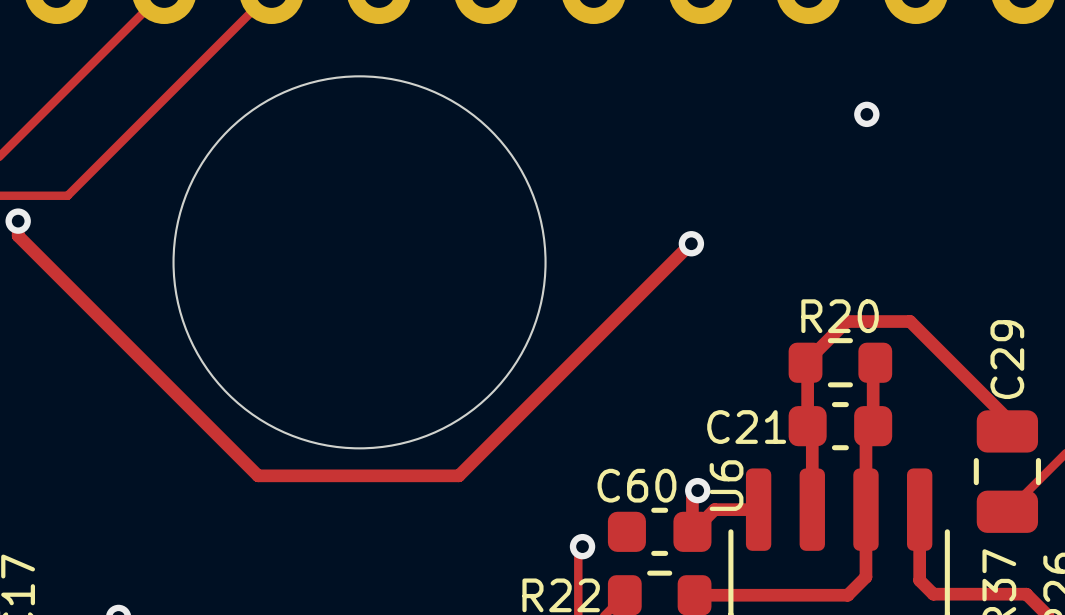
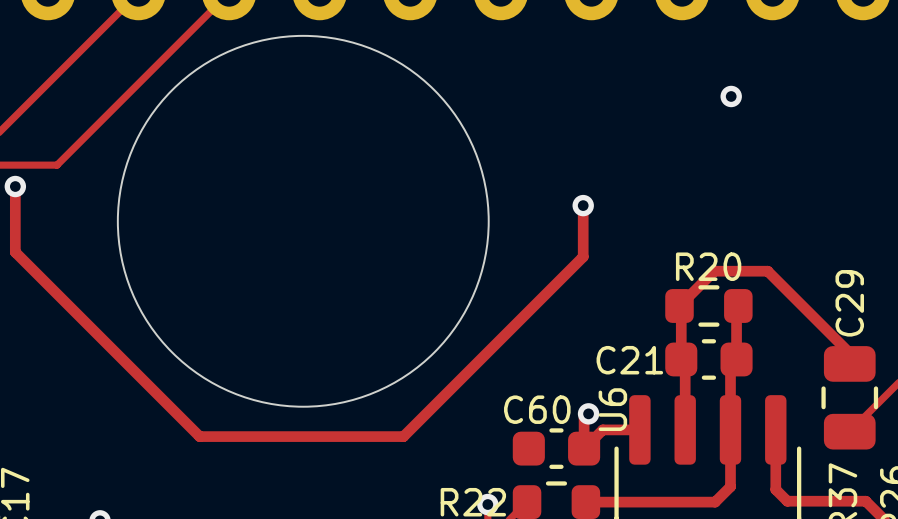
round board edge size: [172, 75, 547, 450] -> [116, 34, 490, 408]
track: (18, 235) (258, 475) (458, 475) (690, 243) -> (15, 199) (15, 252) (199, 436) (403, 436) (583, 256) (583, 205)
track: (582, 546) (578, 550) (578, 598) -> none
via position: (582, 546) -> (487, 504)

